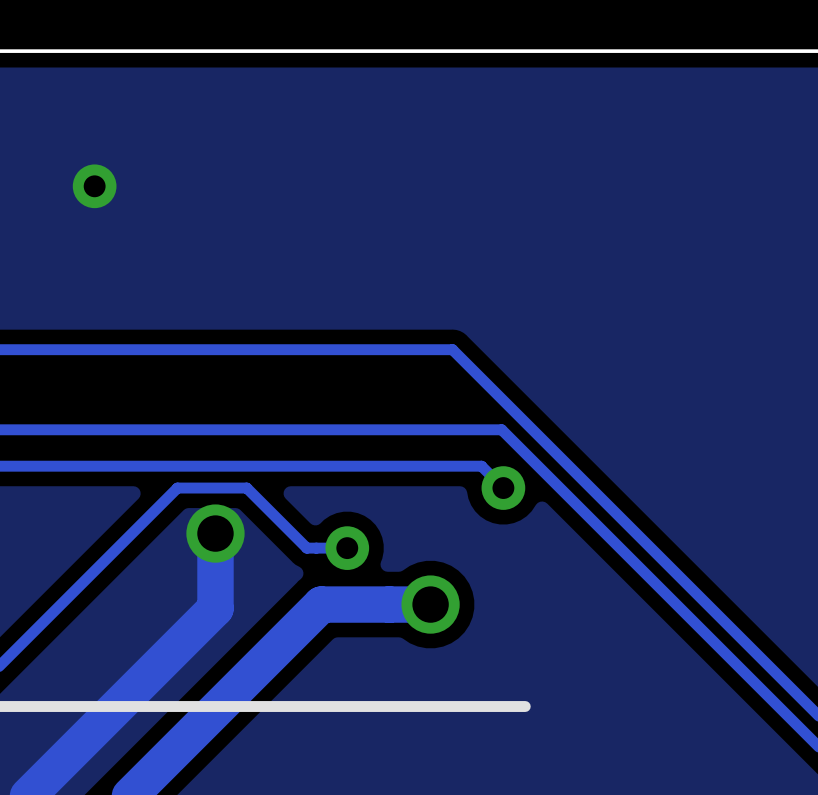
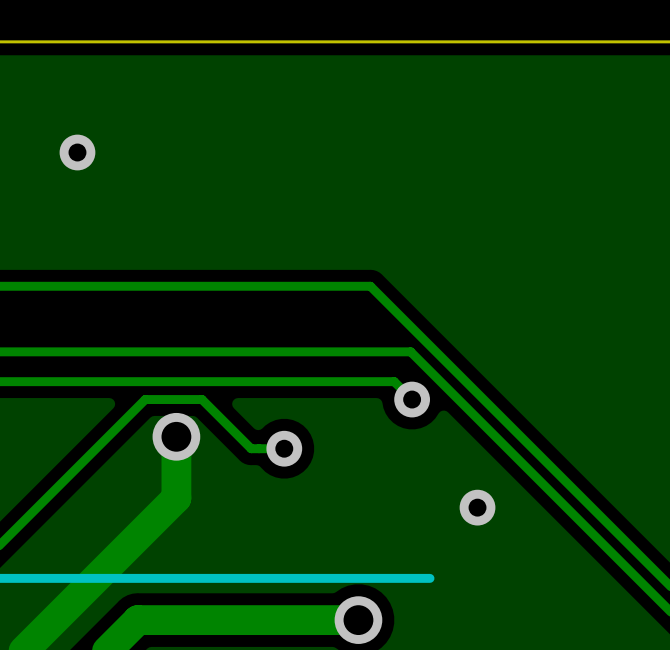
track: (430, 604) (321, 604) (168, 757) -> (358, 620) (137, 620)
via position: (430, 604) -> (358, 620)
via: none -> (477, 507)

